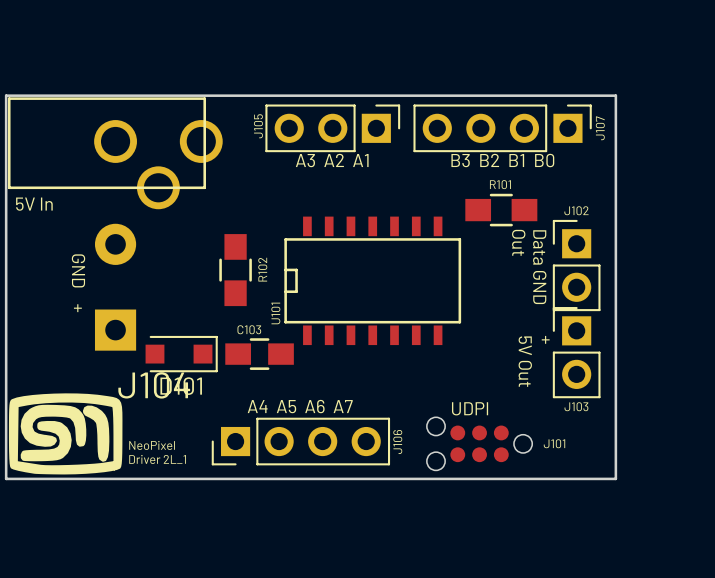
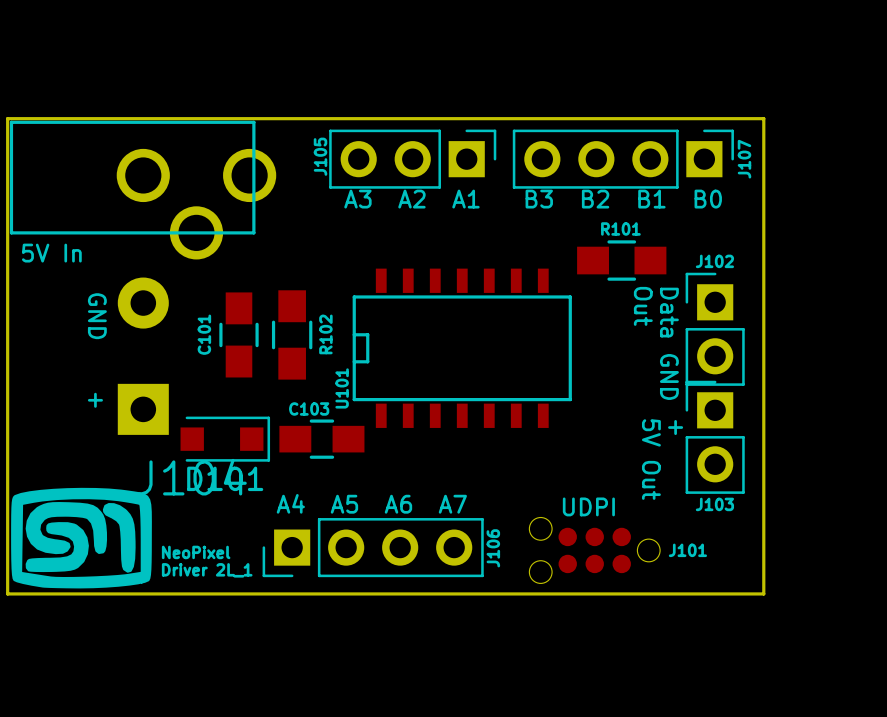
C101: none -> (239, 334)

